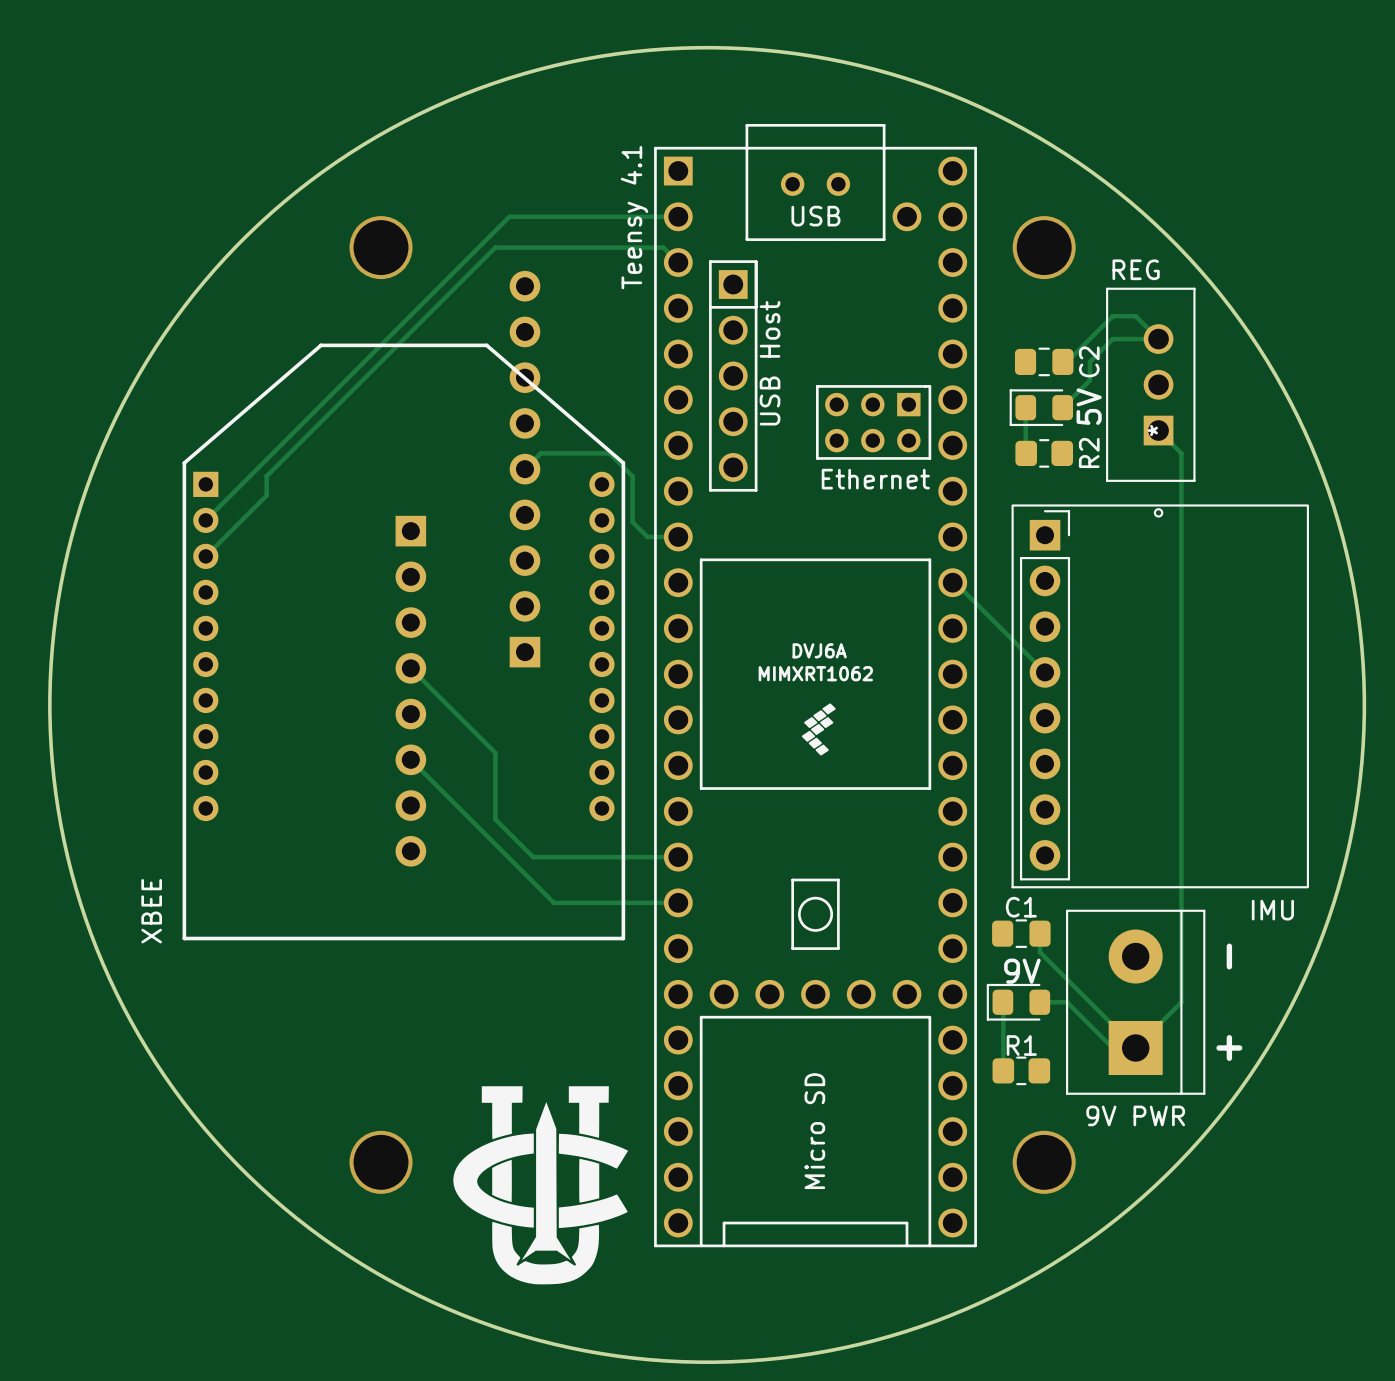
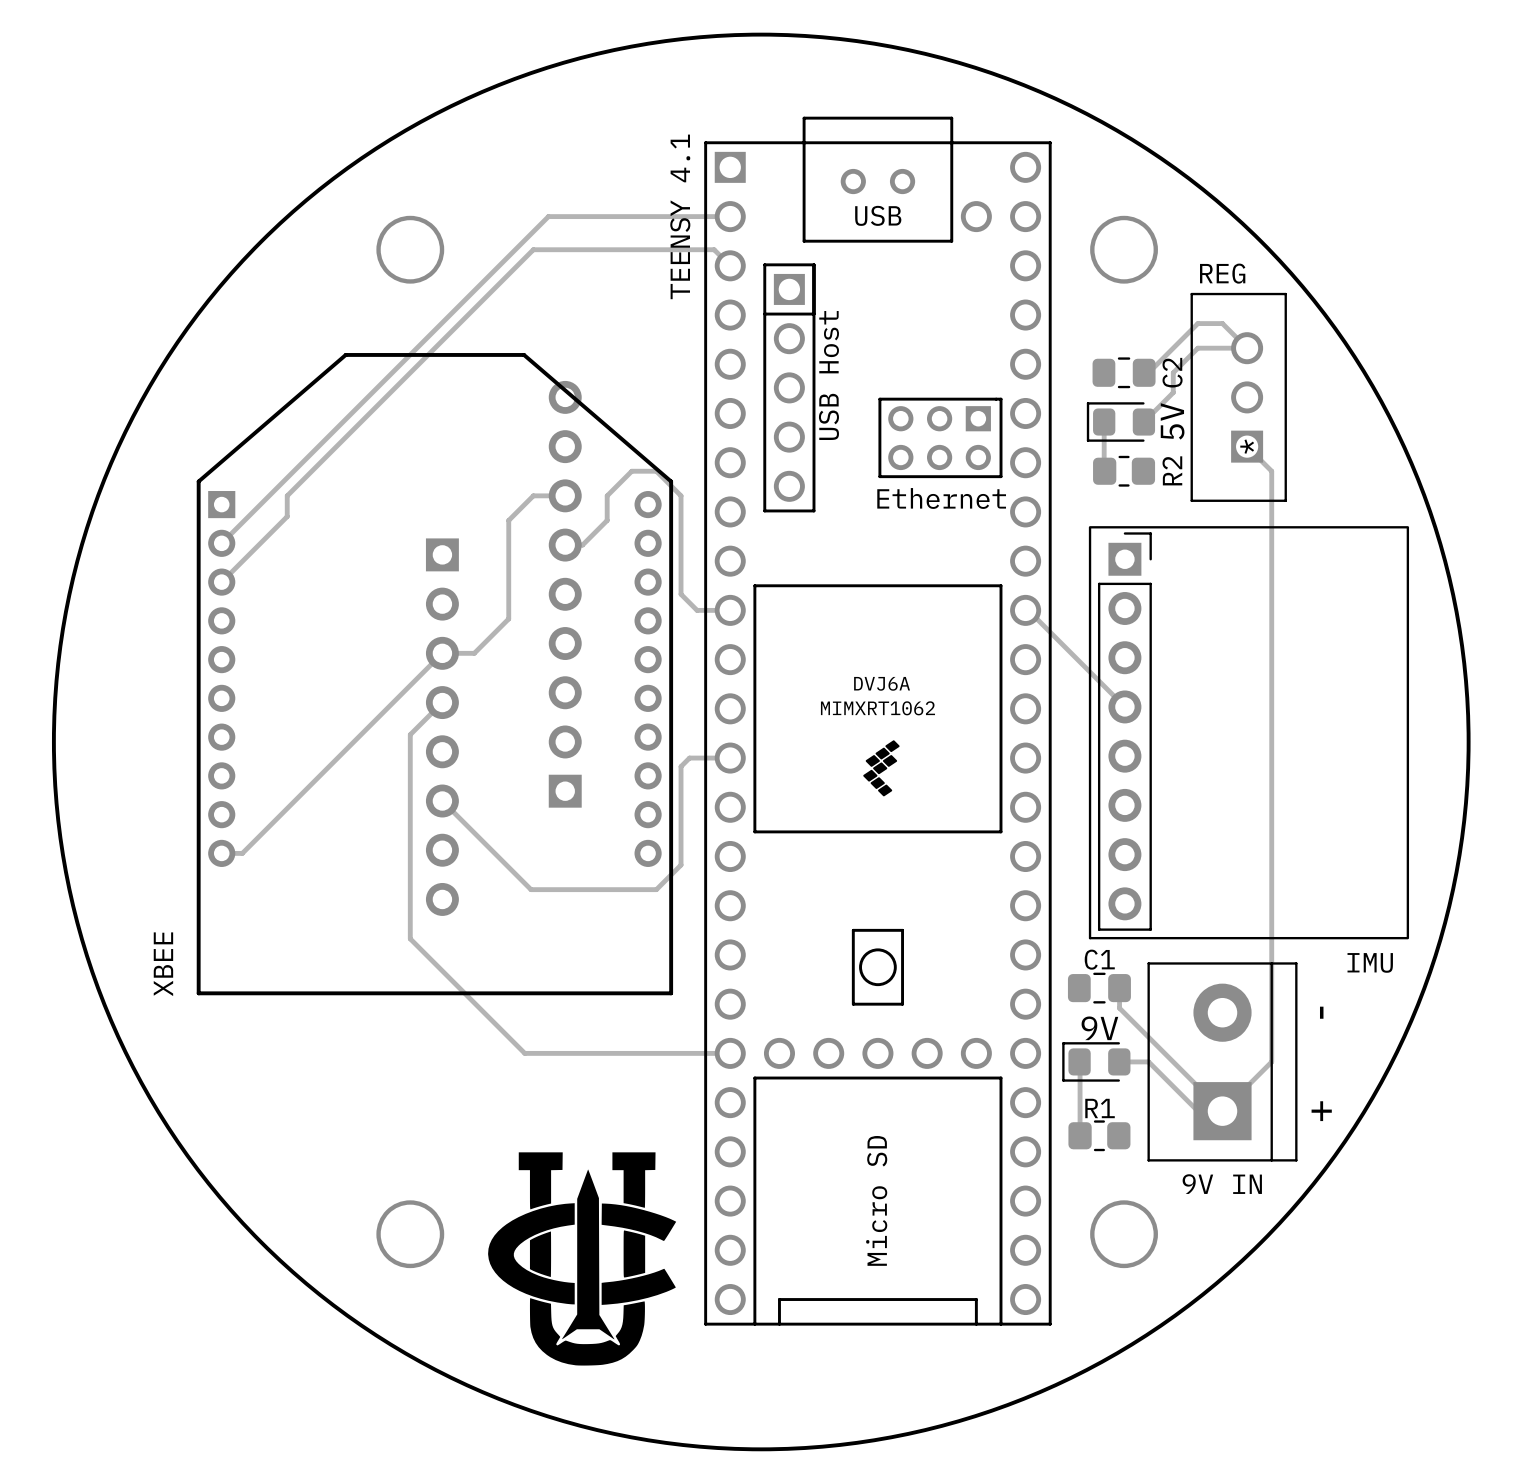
Teensy 4.1 name: Teensy 4.1 (634, 217) -> TEENSY 4.1 (680, 216)
REG footprint: [1106, 287, 1196, 518] -> [1190, 292, 1287, 502]
track: (586, 453) (540, 453) (524, 469) -> (631, 471) (607, 495) (607, 520) (582, 545) (565, 545)
part position: (524, 469) -> (565, 594)
track: none -> (565, 495) (533, 495) (508, 520) (508, 618) (474, 653) (442, 653) (242, 853) (221, 853)
track: (632, 522) (647, 536) (678, 536) -> (681, 545) (681, 594) (697, 610) (730, 610)
track: (410, 668) (495, 752) (495, 819) (533, 857) (678, 857) -> (442, 702) (410, 734) (410, 938) (524, 1053) (730, 1053) (721, 1061)
track: (493, 842) (553, 902) (678, 902) -> (531, 889) (656, 889) (681, 865) (681, 766) (689, 758) (730, 758)
9V PWR name: 9V PWR (1135, 1115) -> 9V IN (1222, 1184)

